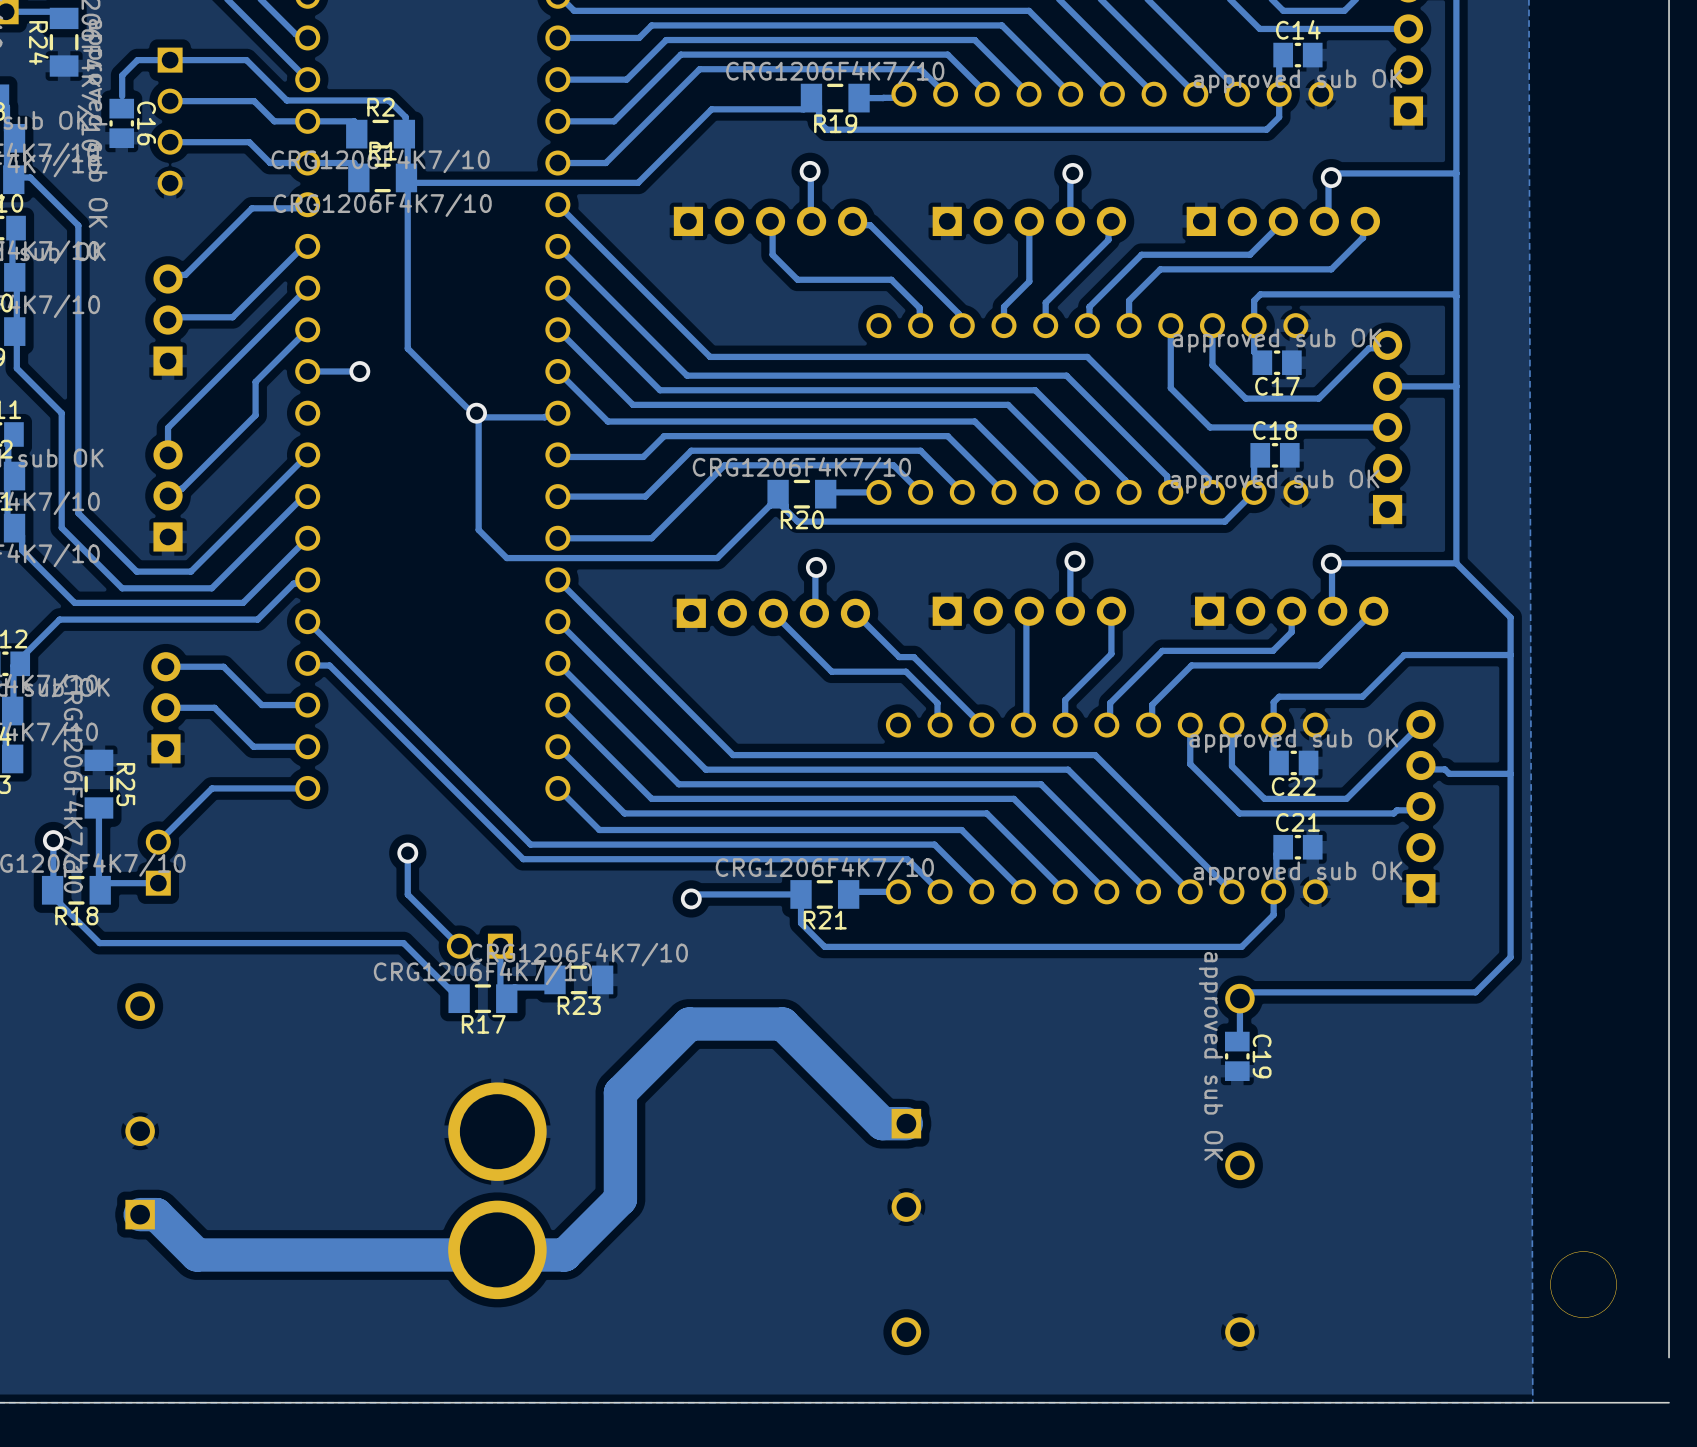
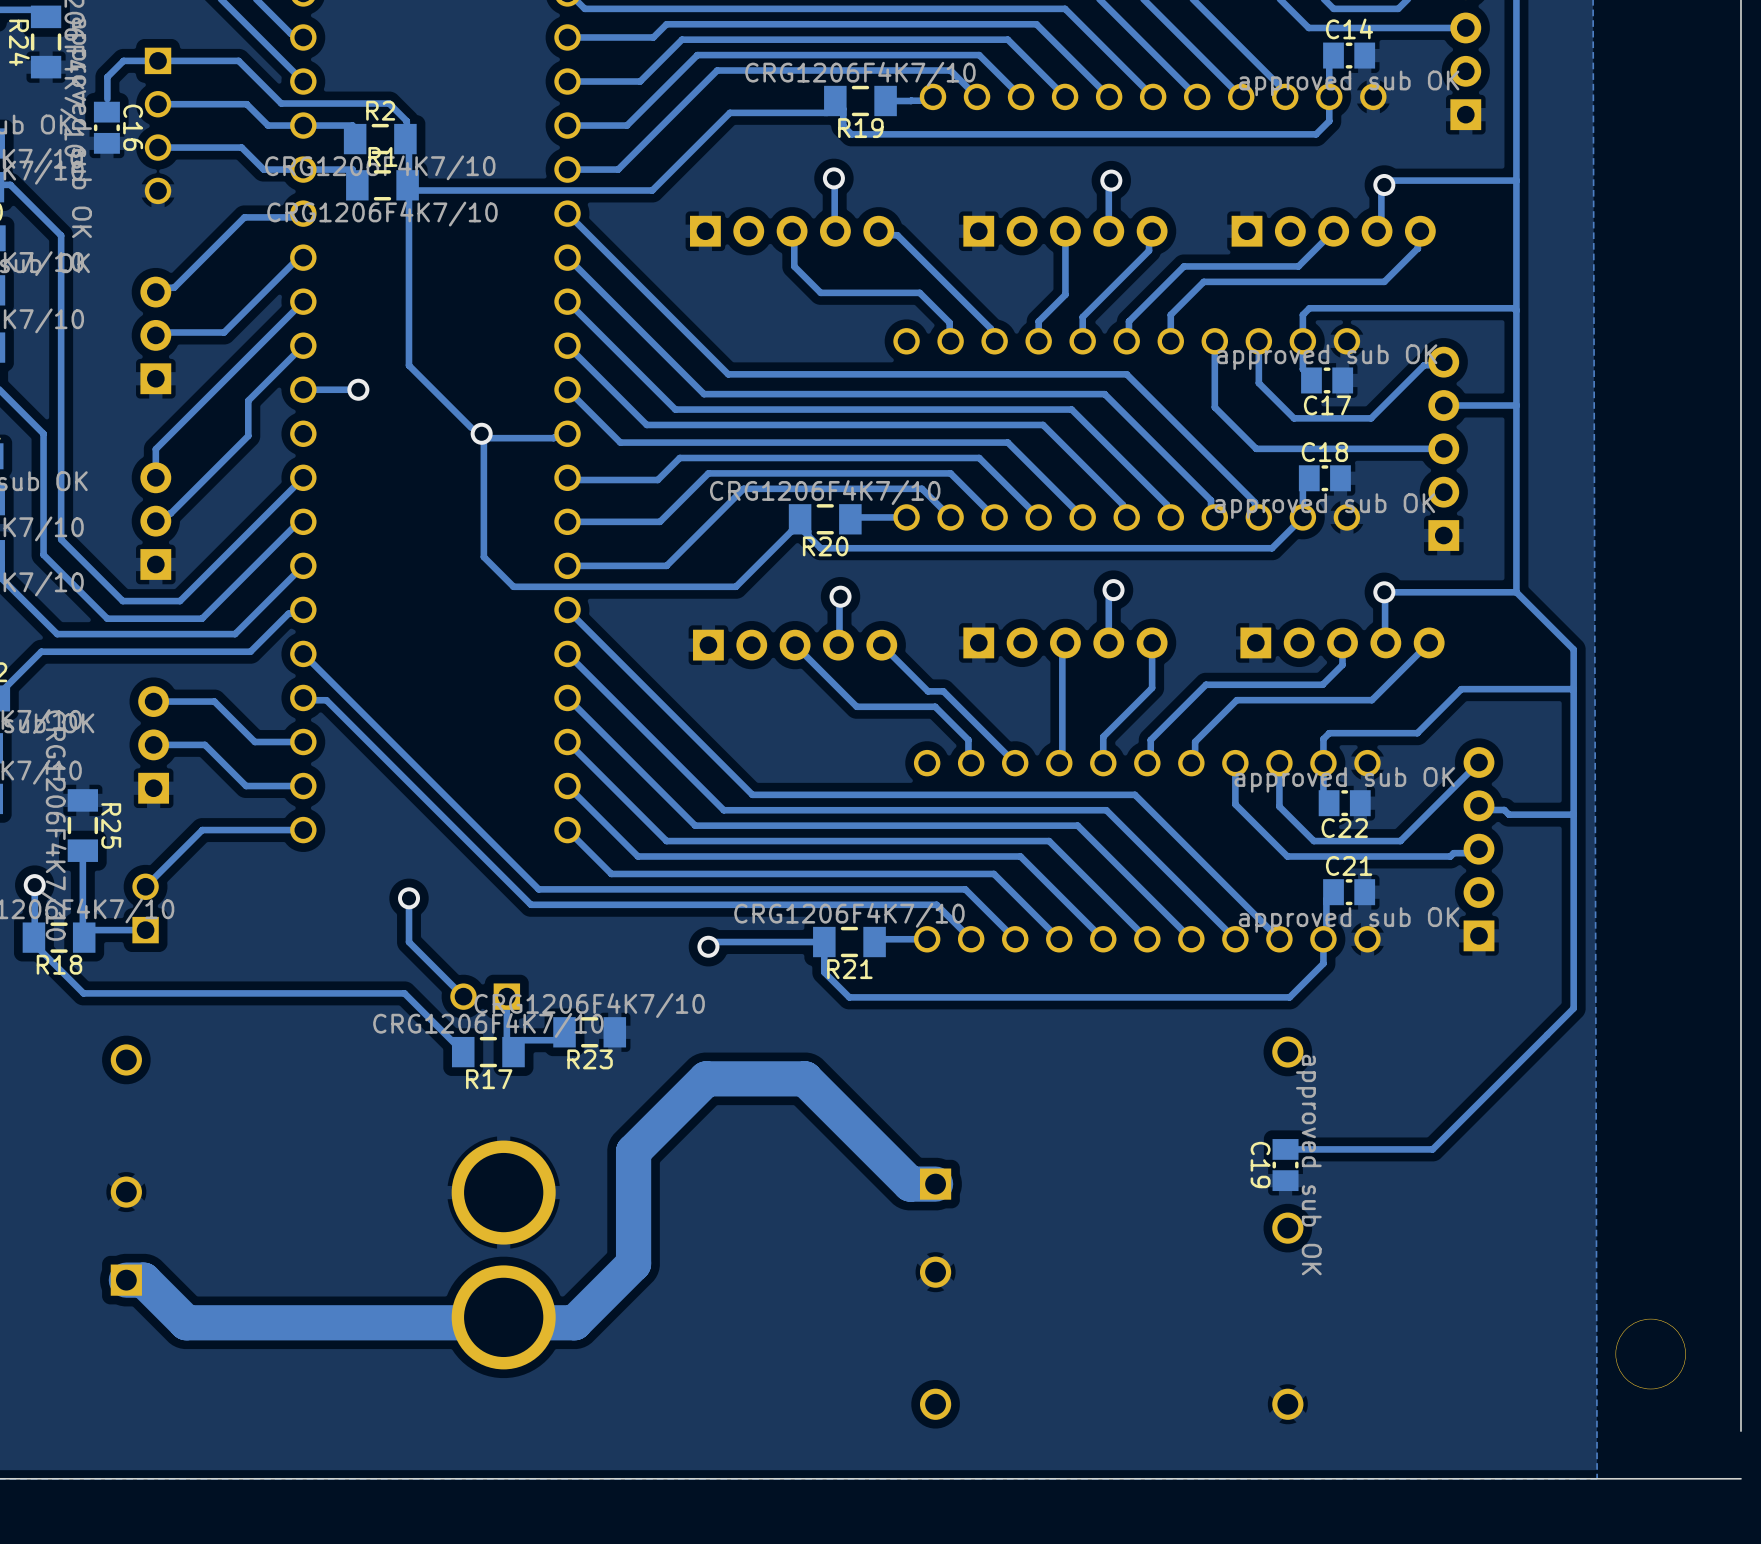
track: (1475, 992) (1246, 992) (1239, 998) (1239, 1038) (1237, 1041) -> (1536, 1045) (1432, 1149) (1285, 1149)
C19 value position: approved sub OK (1210, 1056) -> approved sub OK (1308, 1165)
C19 position: (1237, 1056) -> (1285, 1165)
C19 name position: C19 (1262, 1056) -> C19 (1260, 1165)

